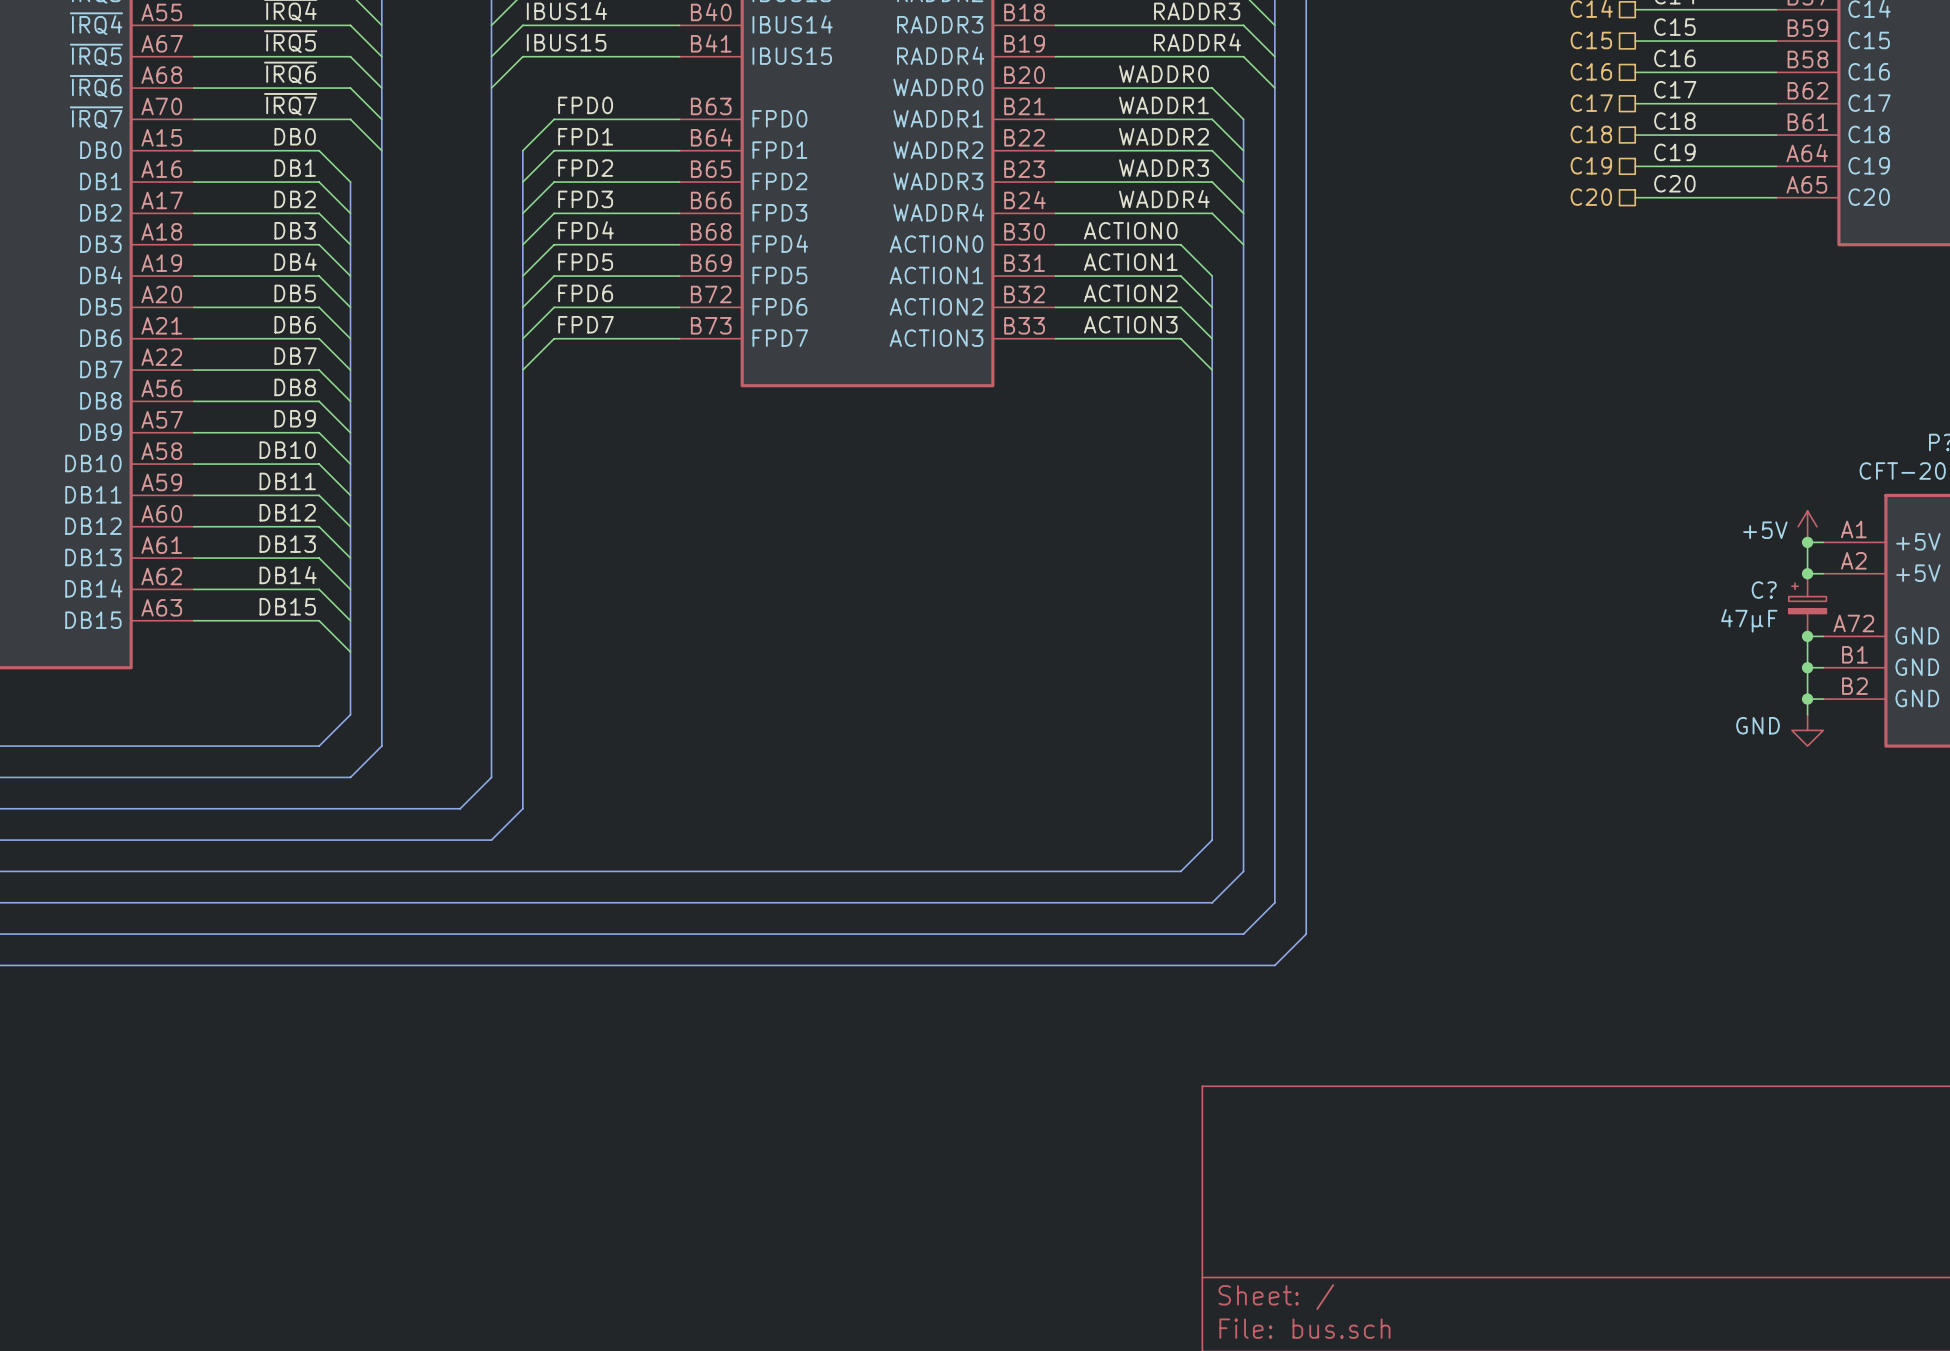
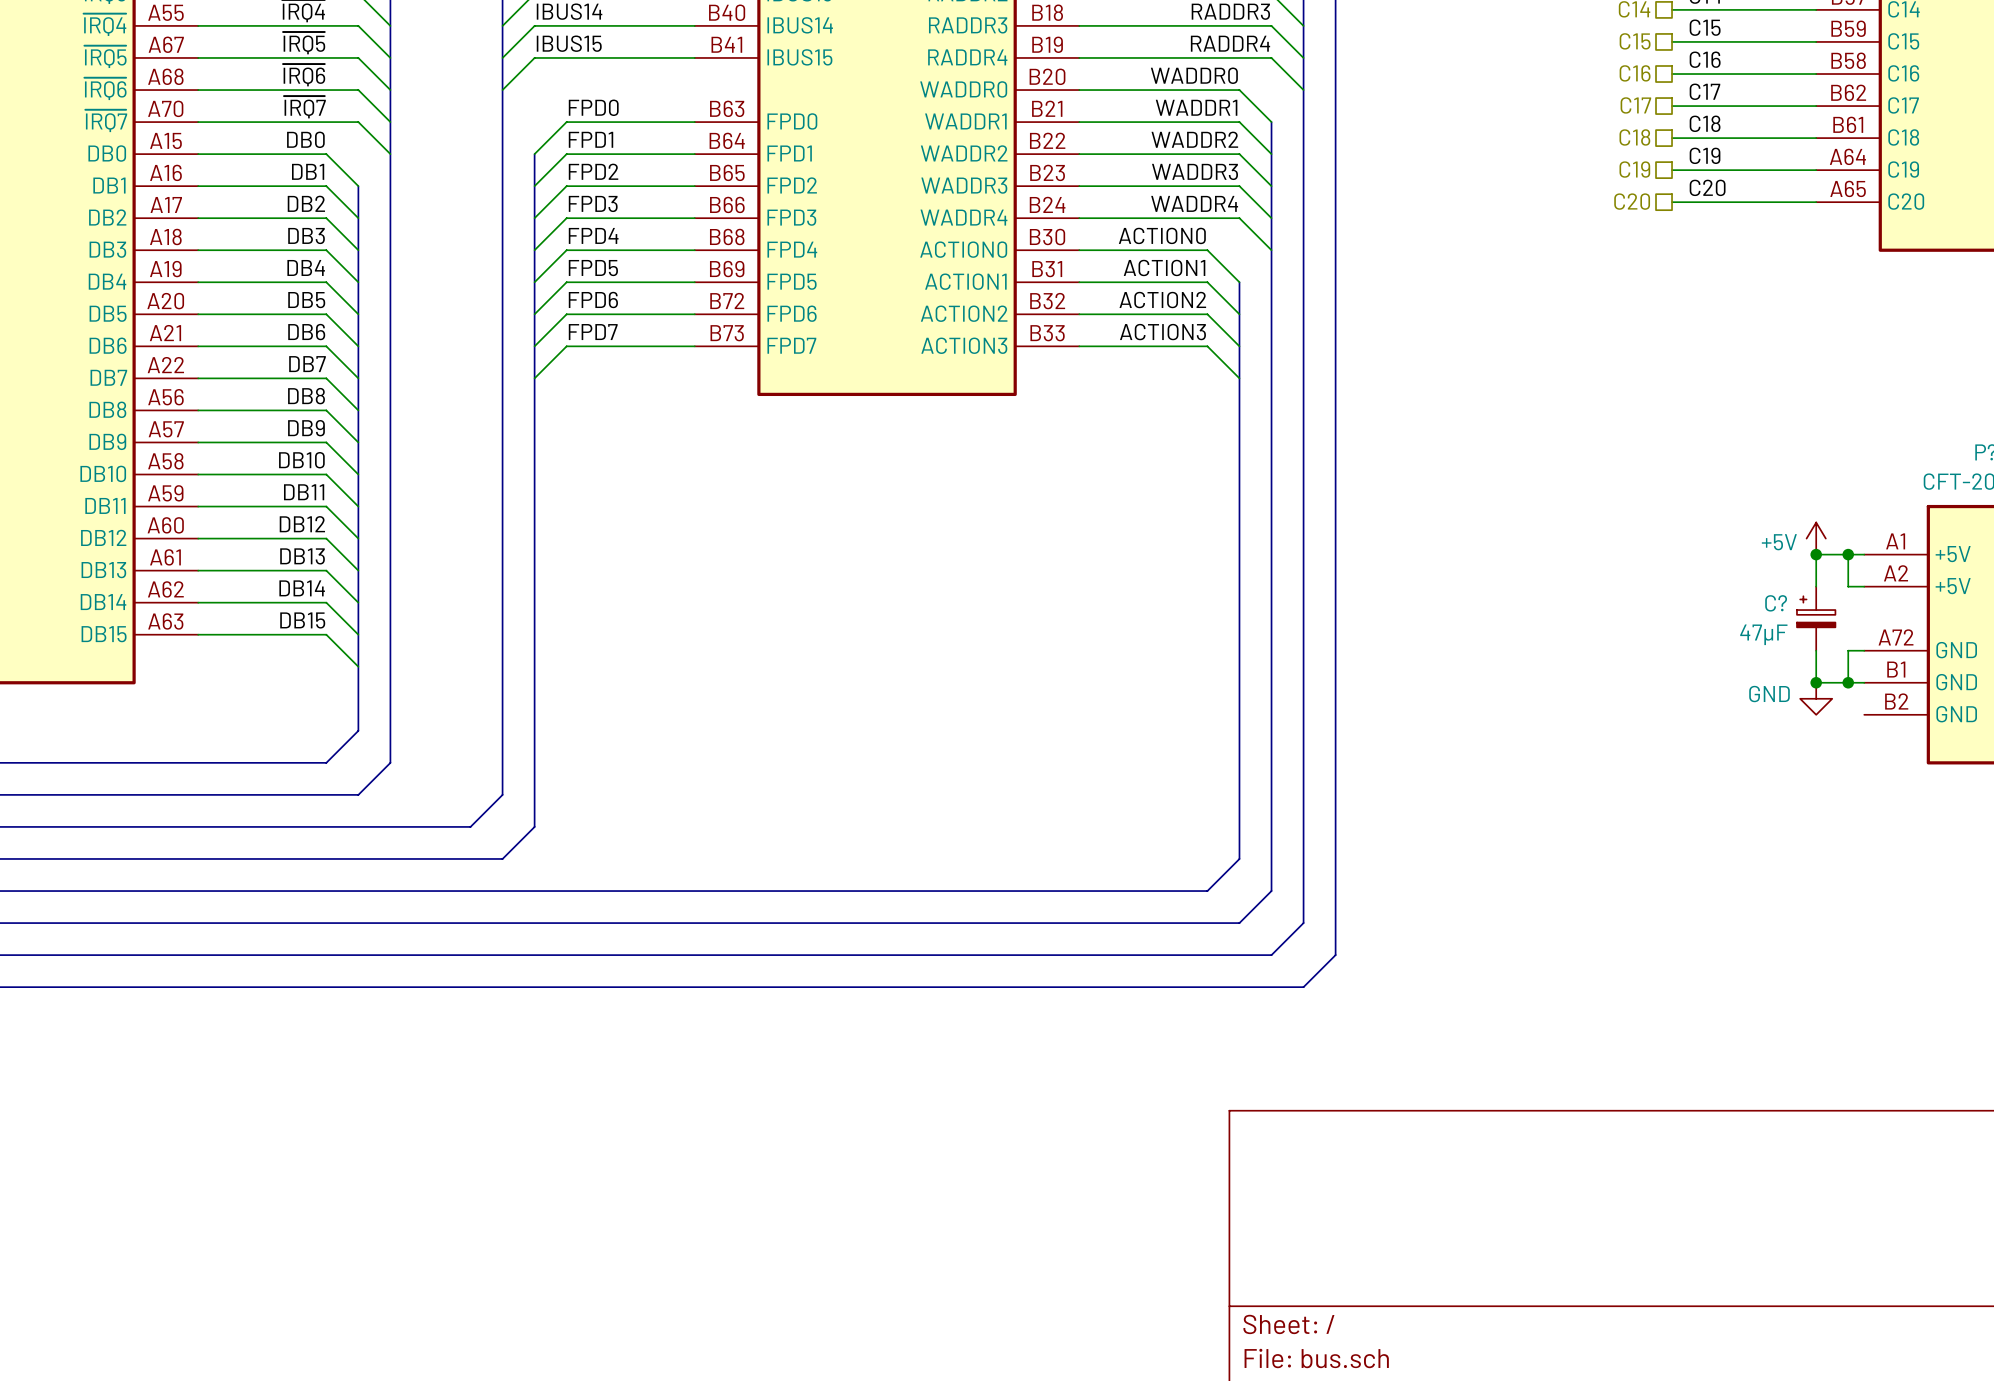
power symbol position: +5V (1807, 526) -> +5V (1816, 538)
wire: none -> (1848, 554) (1816, 554) (1816, 586)
junction position: (1807, 573) -> (1816, 554)
C? position: (1807, 605) -> (1816, 618)
junction: (1807, 636) -> none
junction: none -> (1816, 682)
wire: (1807, 667) (1807, 714) -> (1848, 682) (1816, 682) (1816, 650)
wire: (1807, 699) (1823, 699) -> none
junction: (1807, 699) -> none
power symbol position: GND (1807, 730) -> GND (1816, 698)

